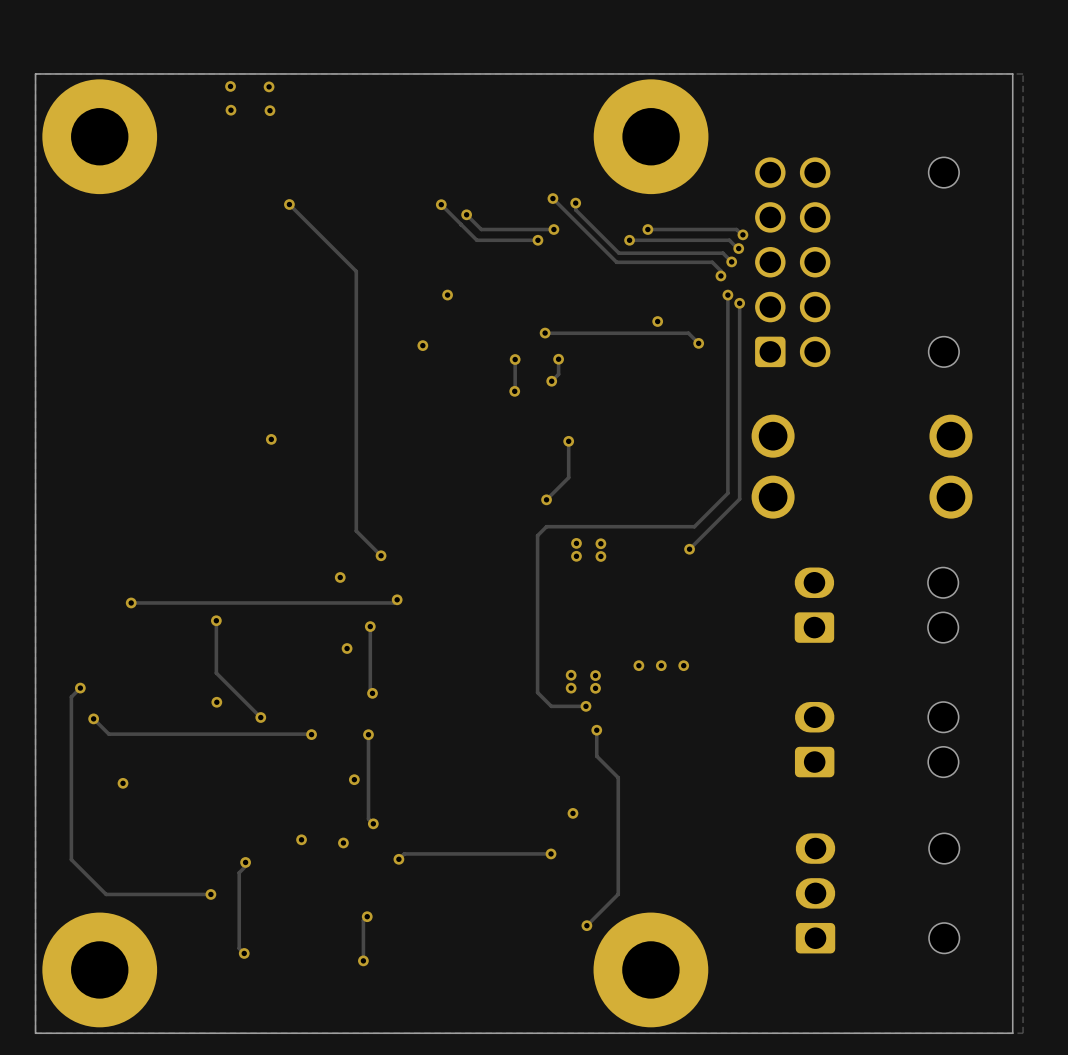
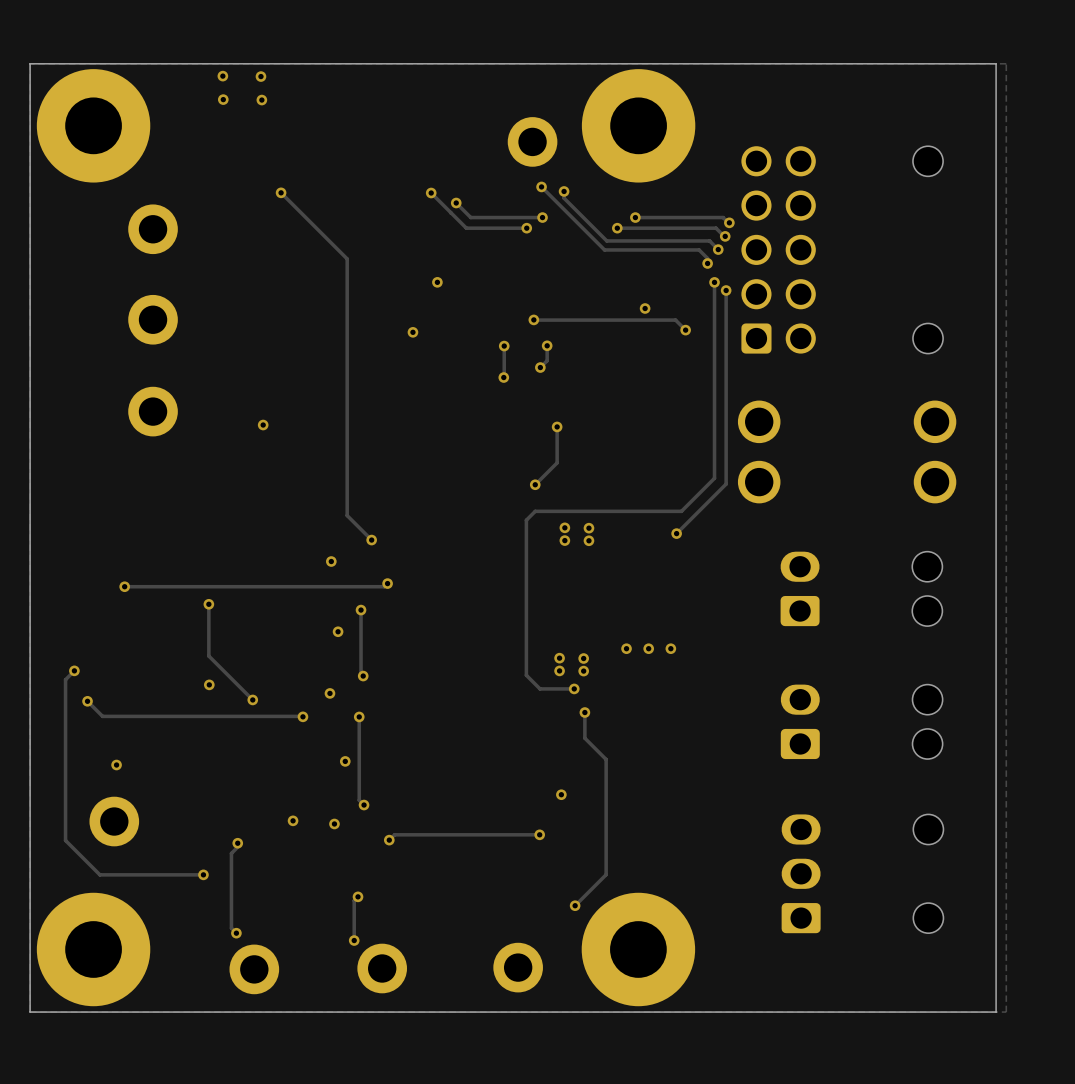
part: none -> (532, 141)
part: none -> (153, 229)
part: none -> (153, 319)
part: none -> (153, 411)
via: none -> (329, 693)
part: none -> (114, 821)
part: none -> (518, 967)
part: none -> (382, 968)
part: none -> (254, 969)

